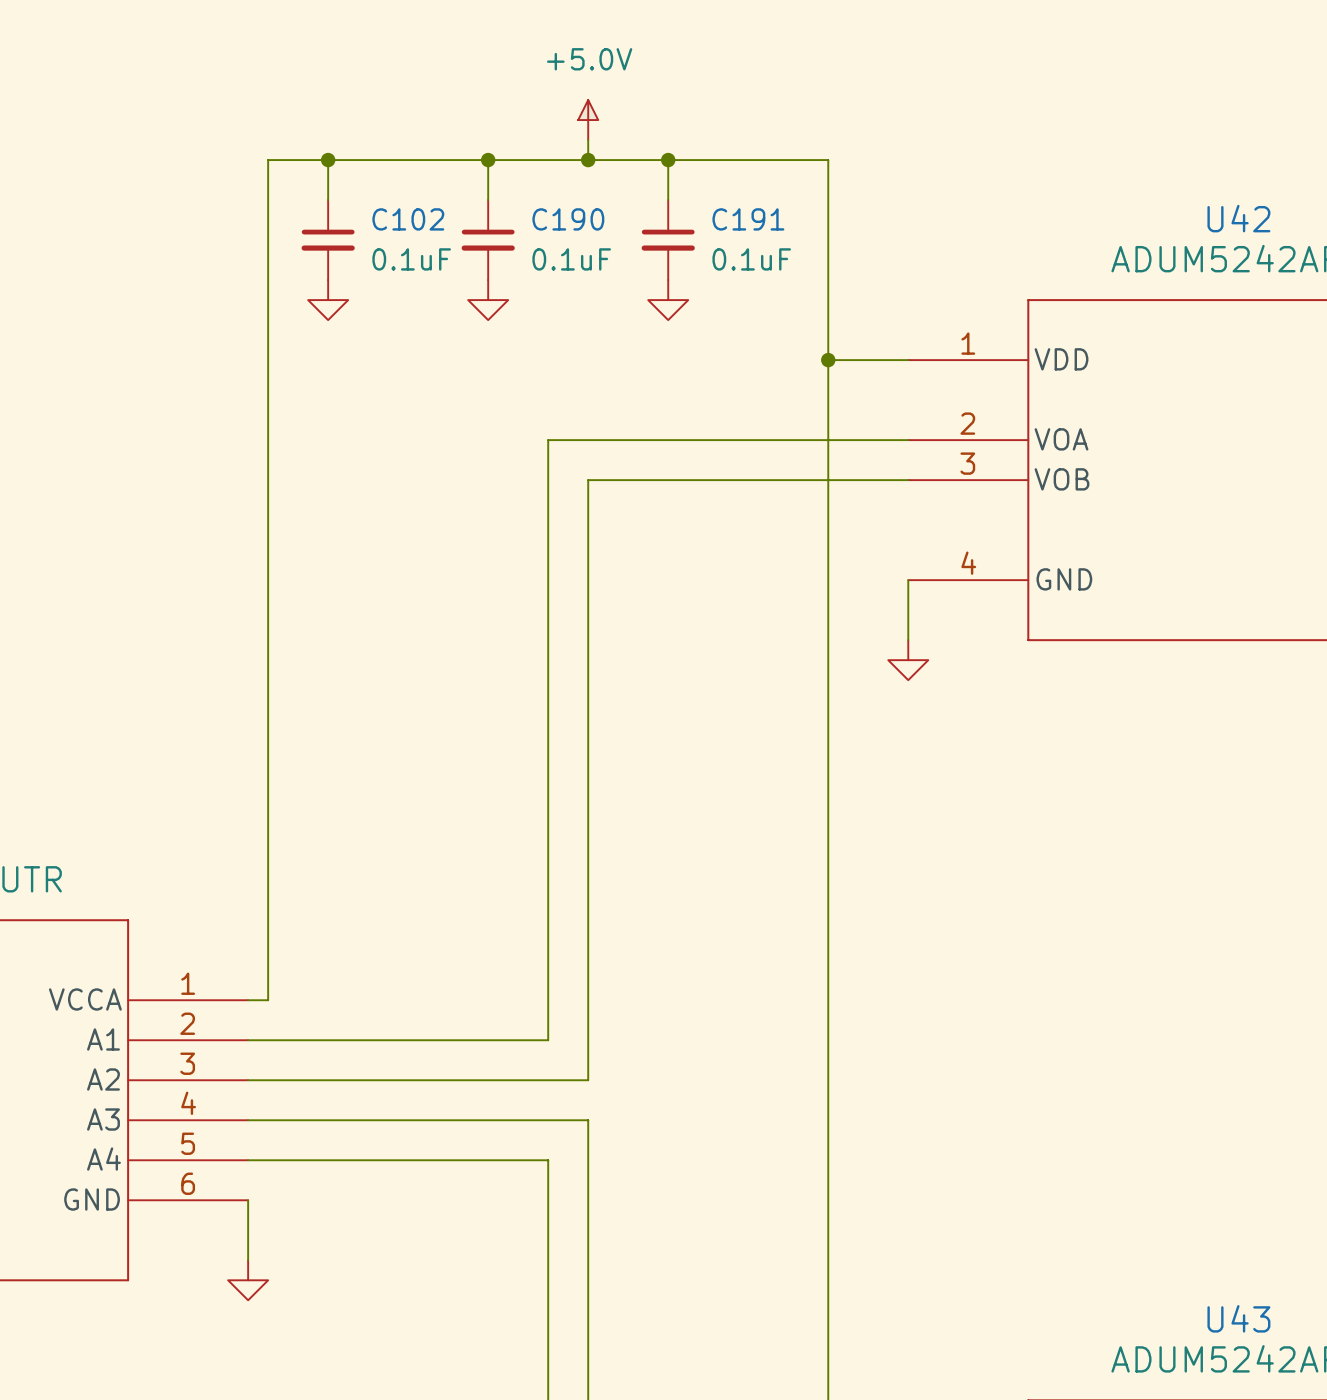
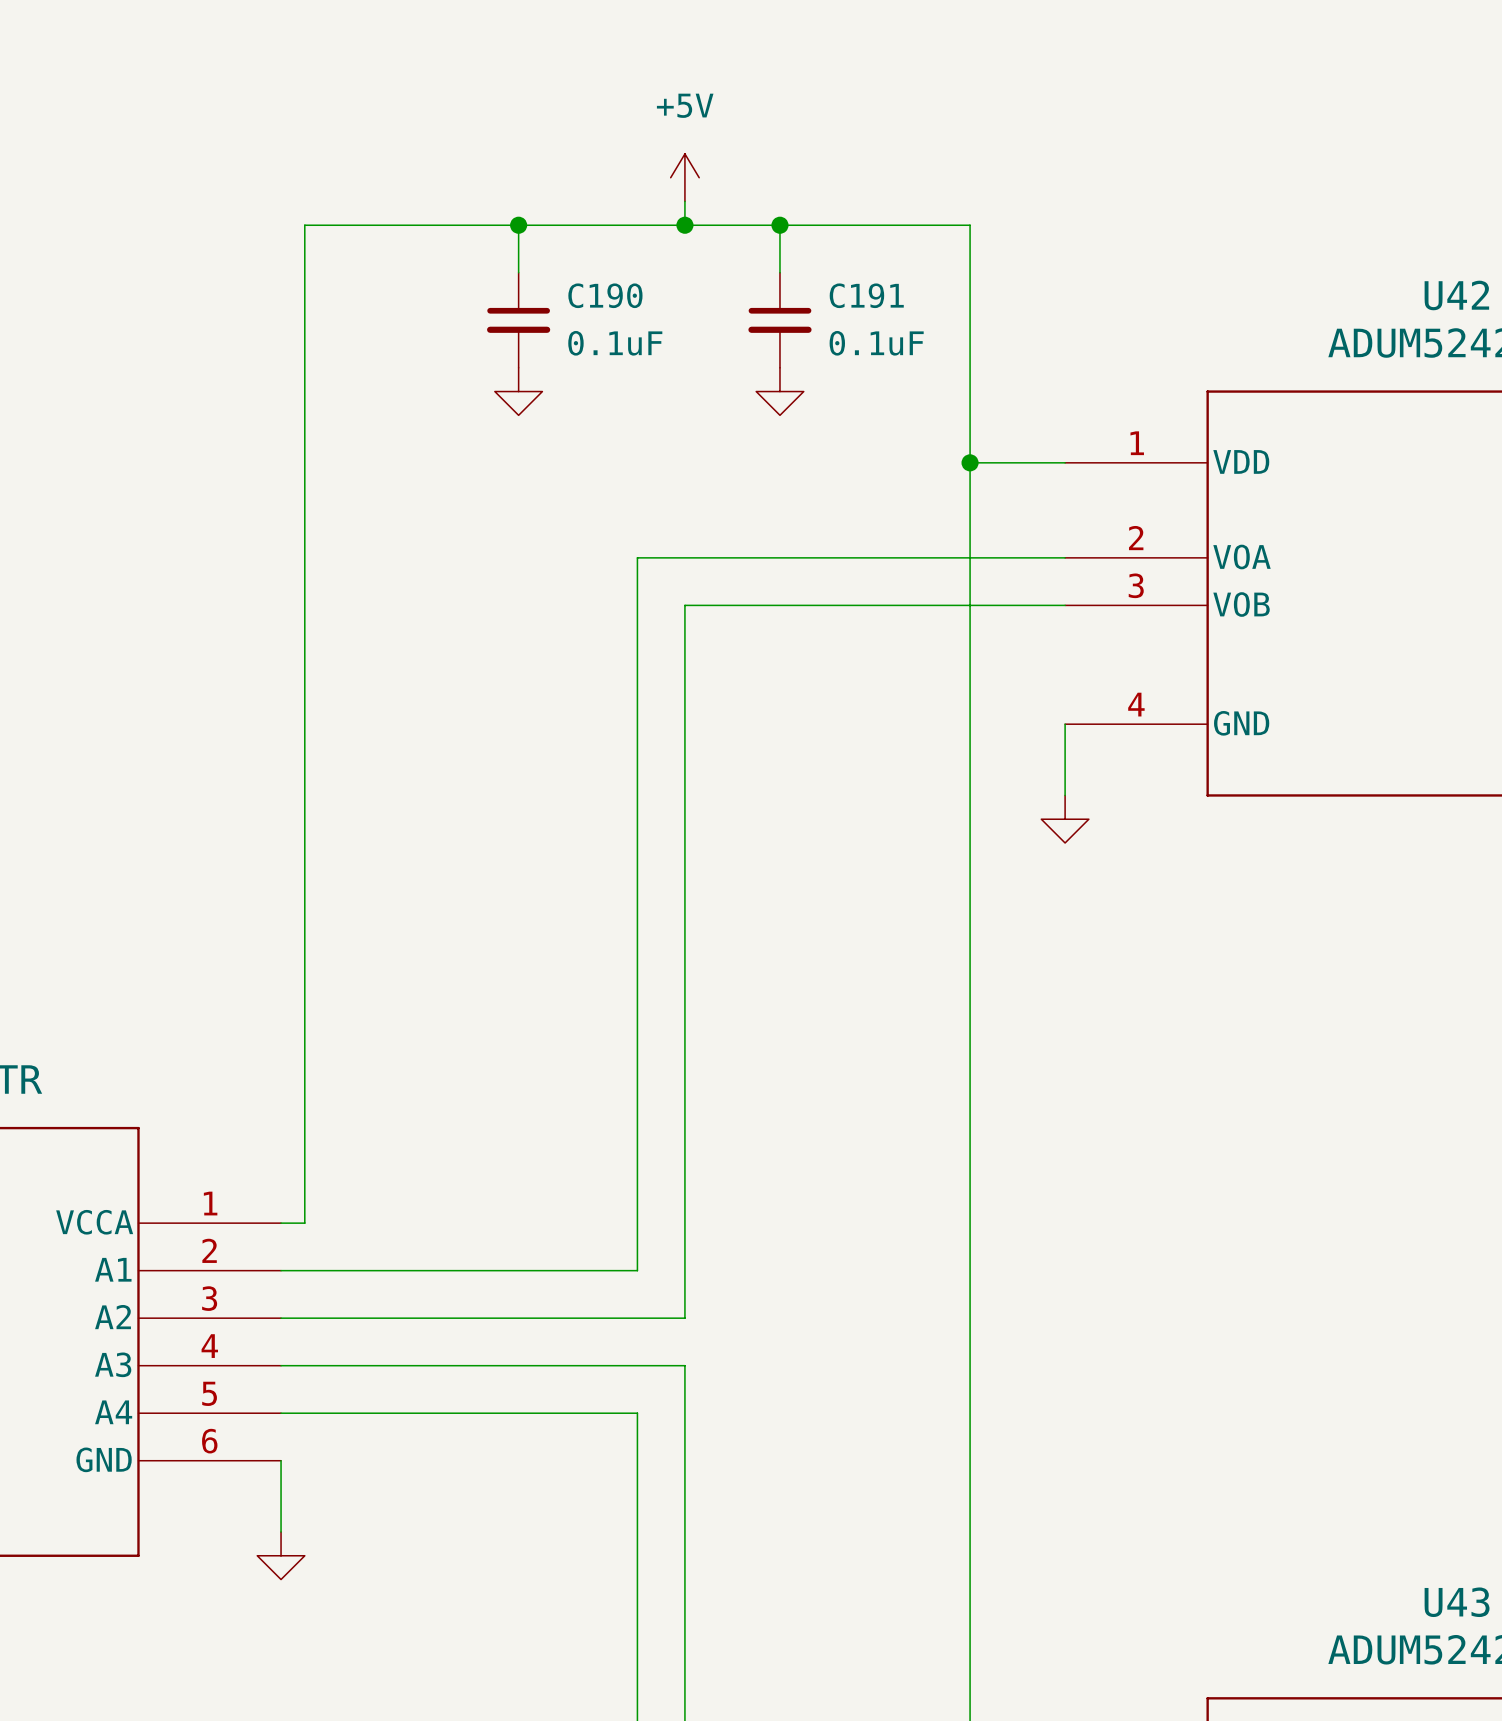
power symbol: +5.0V (588, 120) -> +5V (684, 177)
wire: (328, 160) (328, 200) -> none
junction: (328, 160) -> none
wire: (488, 160) (488, 200) -> (518, 225) (518, 272)
junction position: (488, 160) -> (518, 225)
C102: 0.1uF (328, 240) -> none
C190 position: (488, 240) -> (518, 320)
power symbol: (328, 300) -> none
power symbol position: (488, 300) -> (518, 391)

